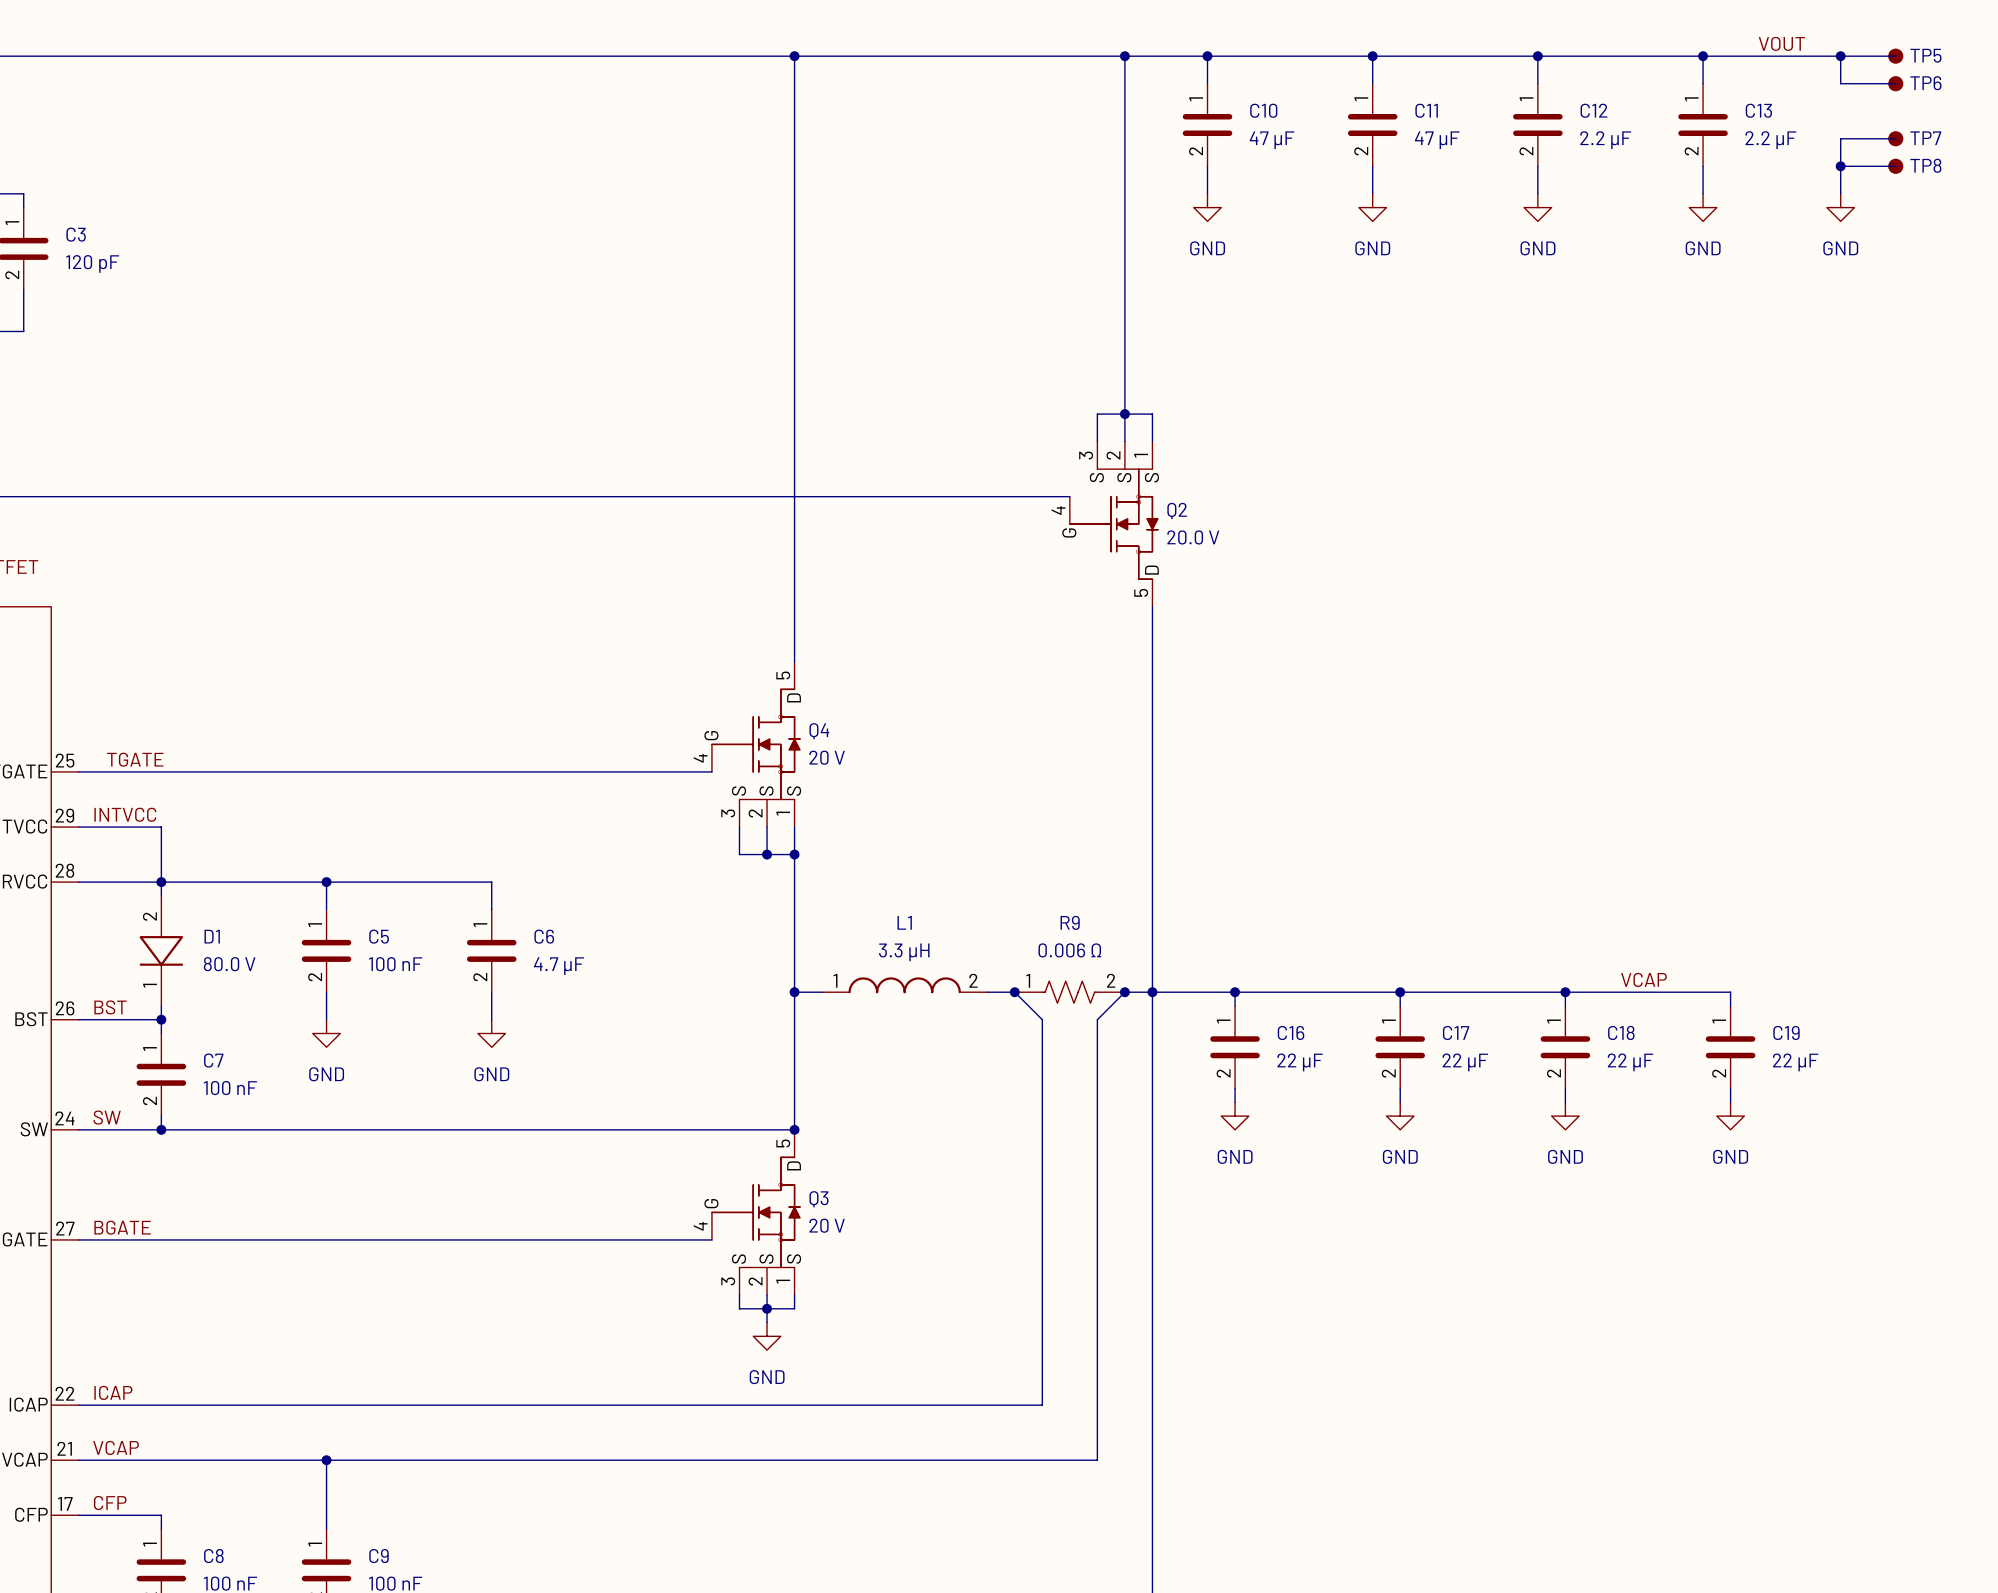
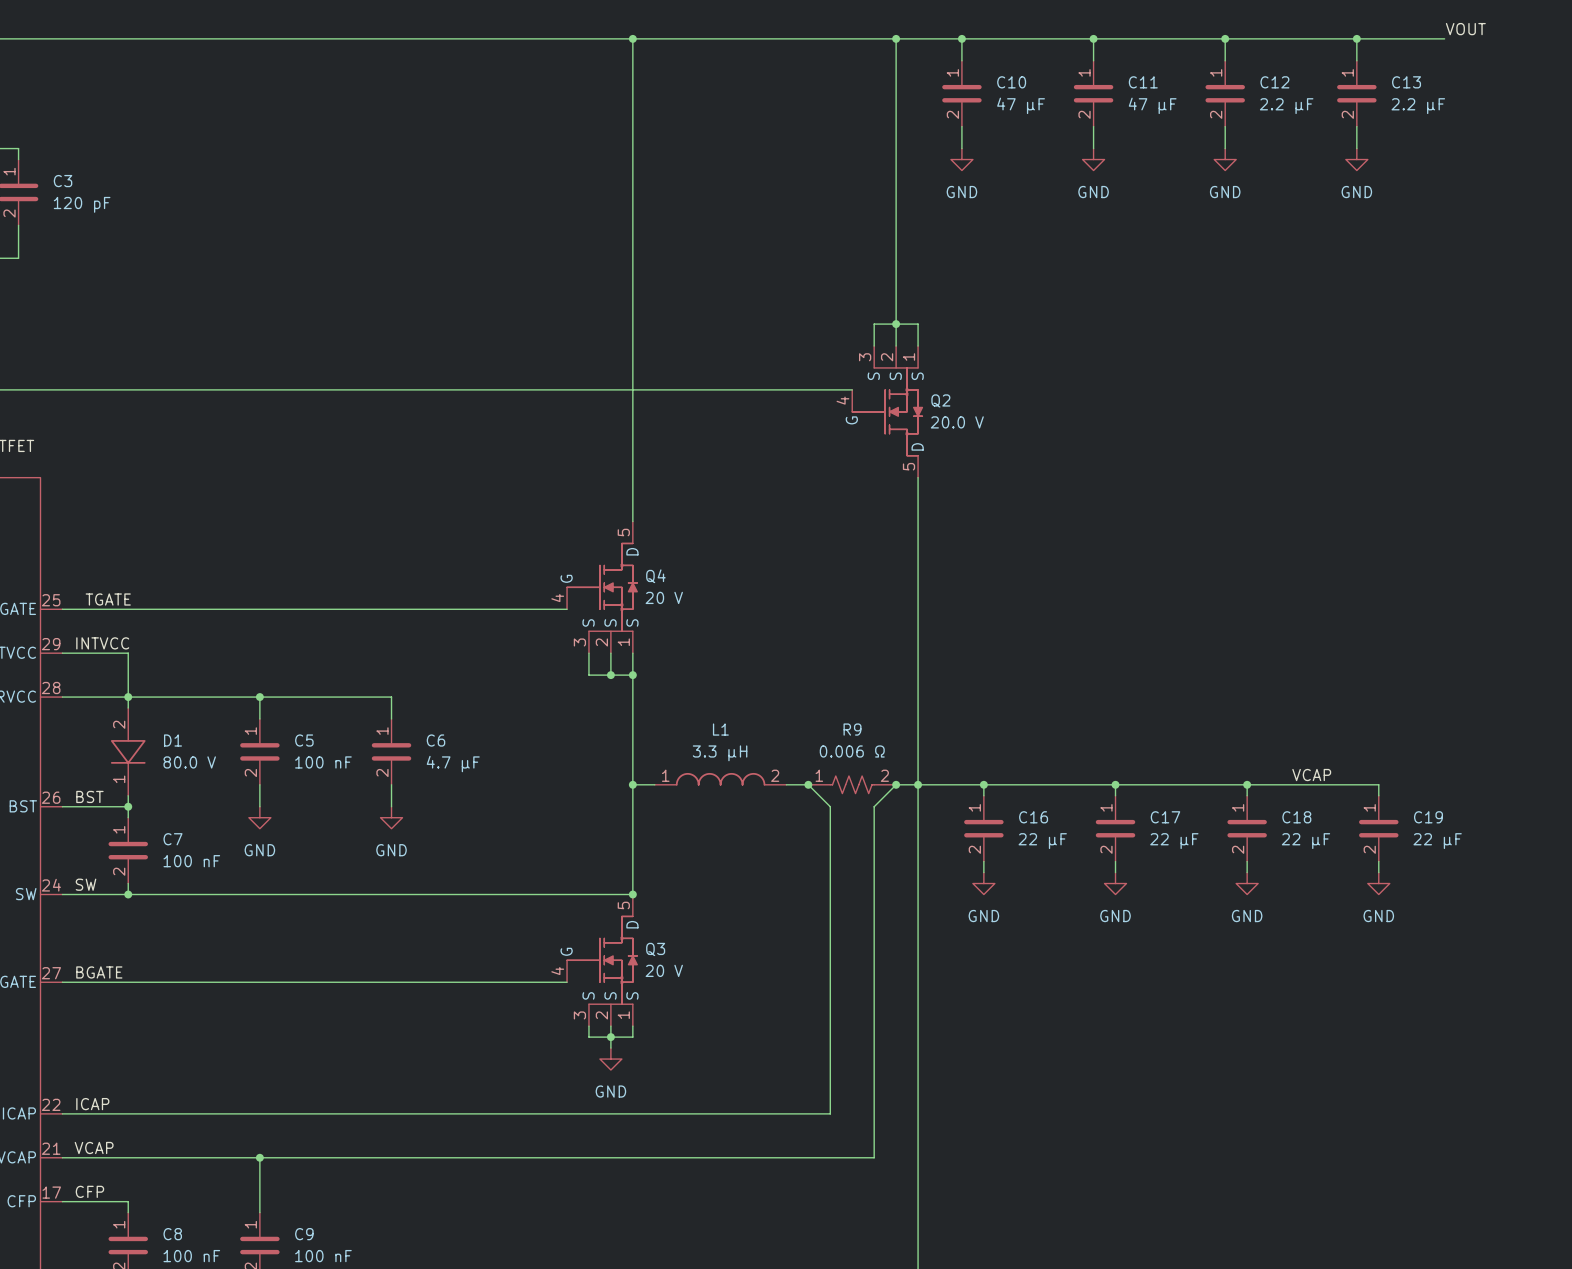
label position: VOUT (1781, 43) -> VOUT (1465, 29)
wire: (1813, 56) (1895, 56) -> none
wire: (1840, 56) (1840, 83) (1895, 83) -> none
junction: (1840, 56) -> none
TP5: (1895, 56) -> none
TP6: (1895, 83) -> none
wire: (1895, 138) (1840, 138) (1840, 193) -> none
TP7: (1895, 138) -> none
wire: (1840, 166) (1895, 166) -> none
junction: (1840, 166) -> none
TP8: (1895, 166) -> none
power symbol: GND (1840, 207) -> none

